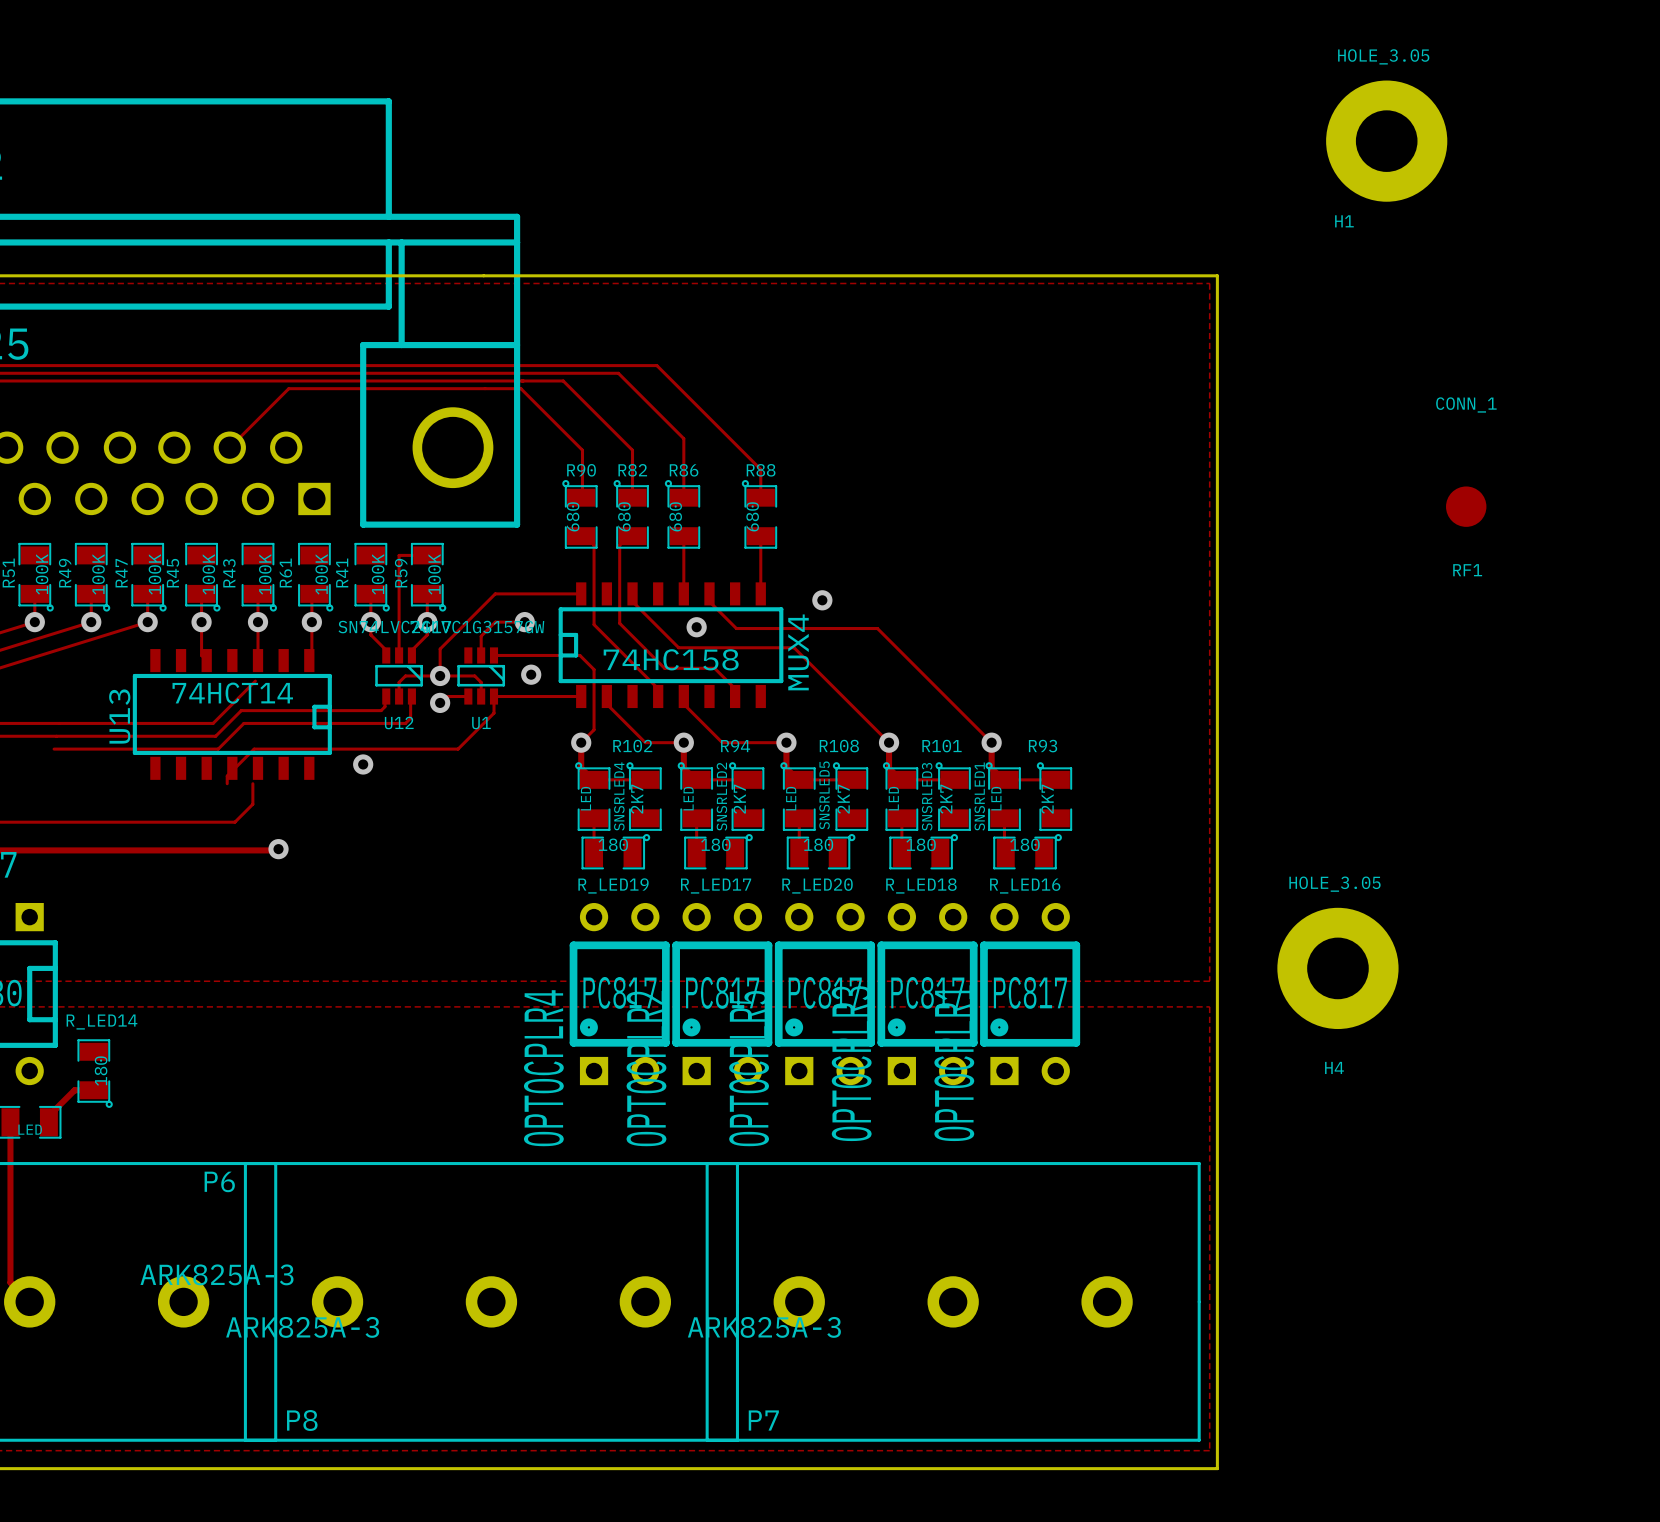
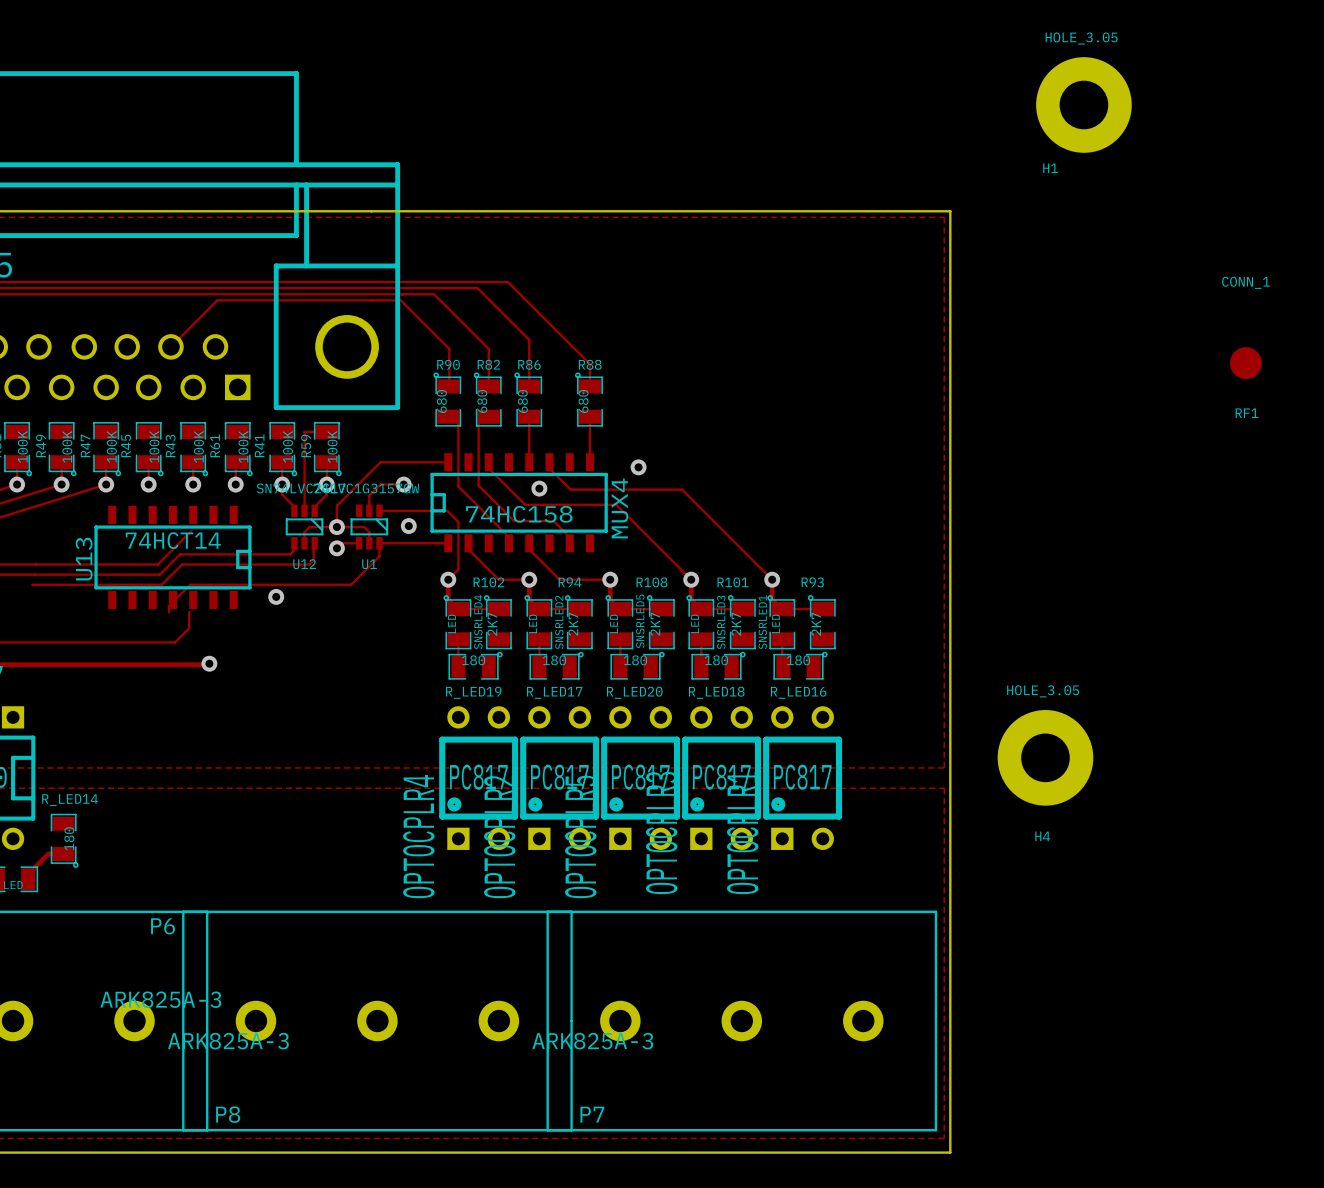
RF1 position: (1466, 506) -> (1245, 363)
track: (201, 622) (201, 655) (206, 660) -> none
track: (258, 622) (258, 660) -> none
track: (311, 622) (311, 658) (309, 660) -> none

